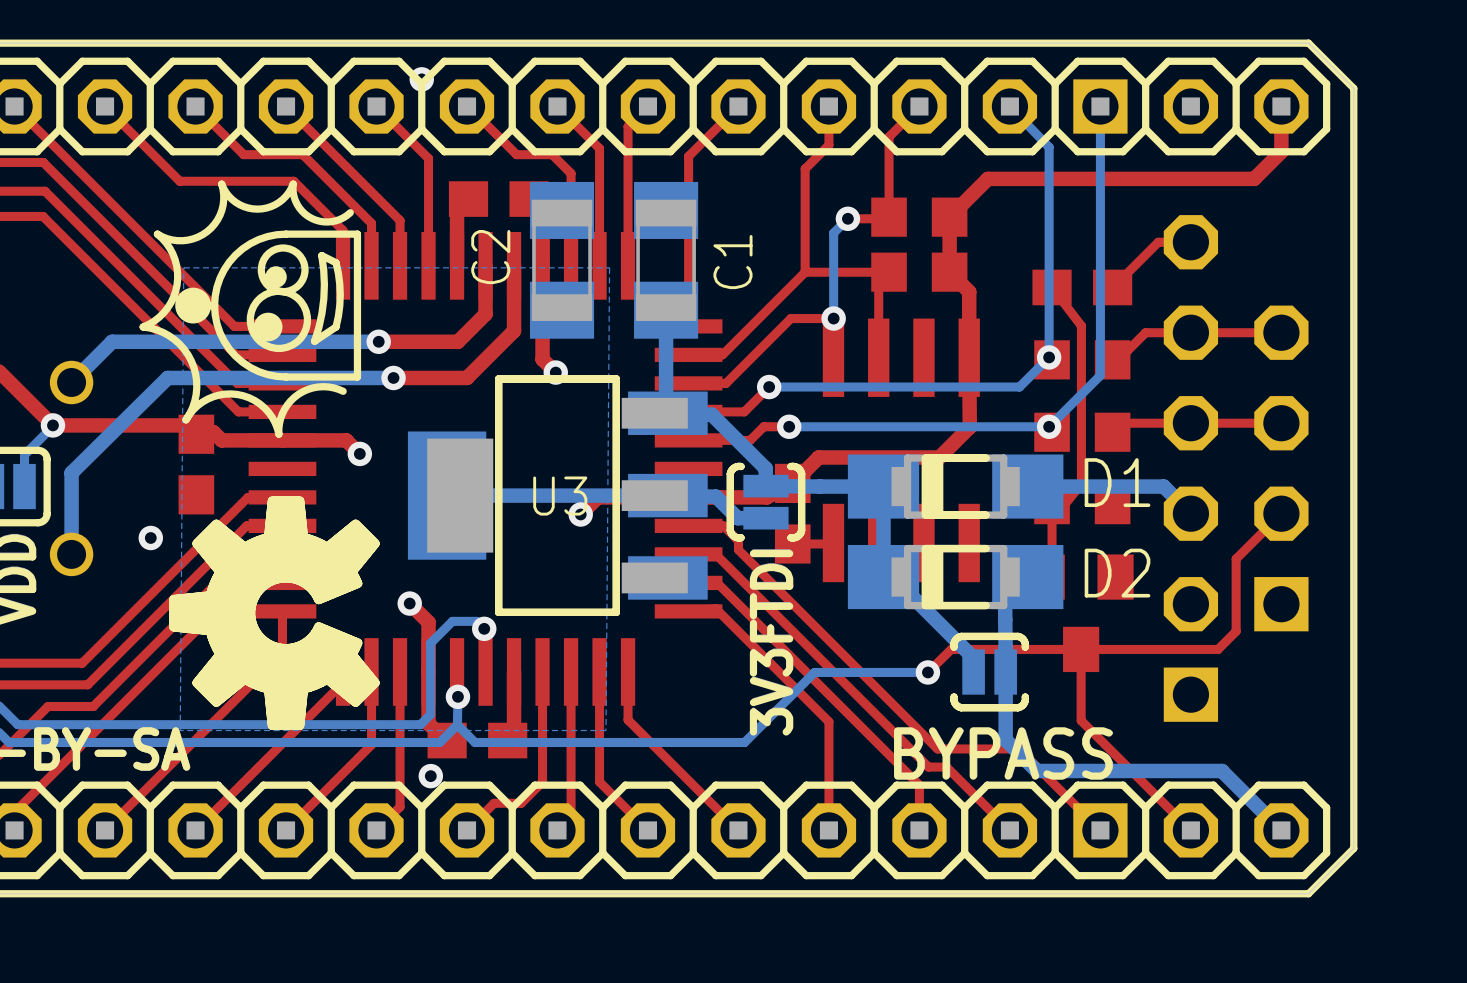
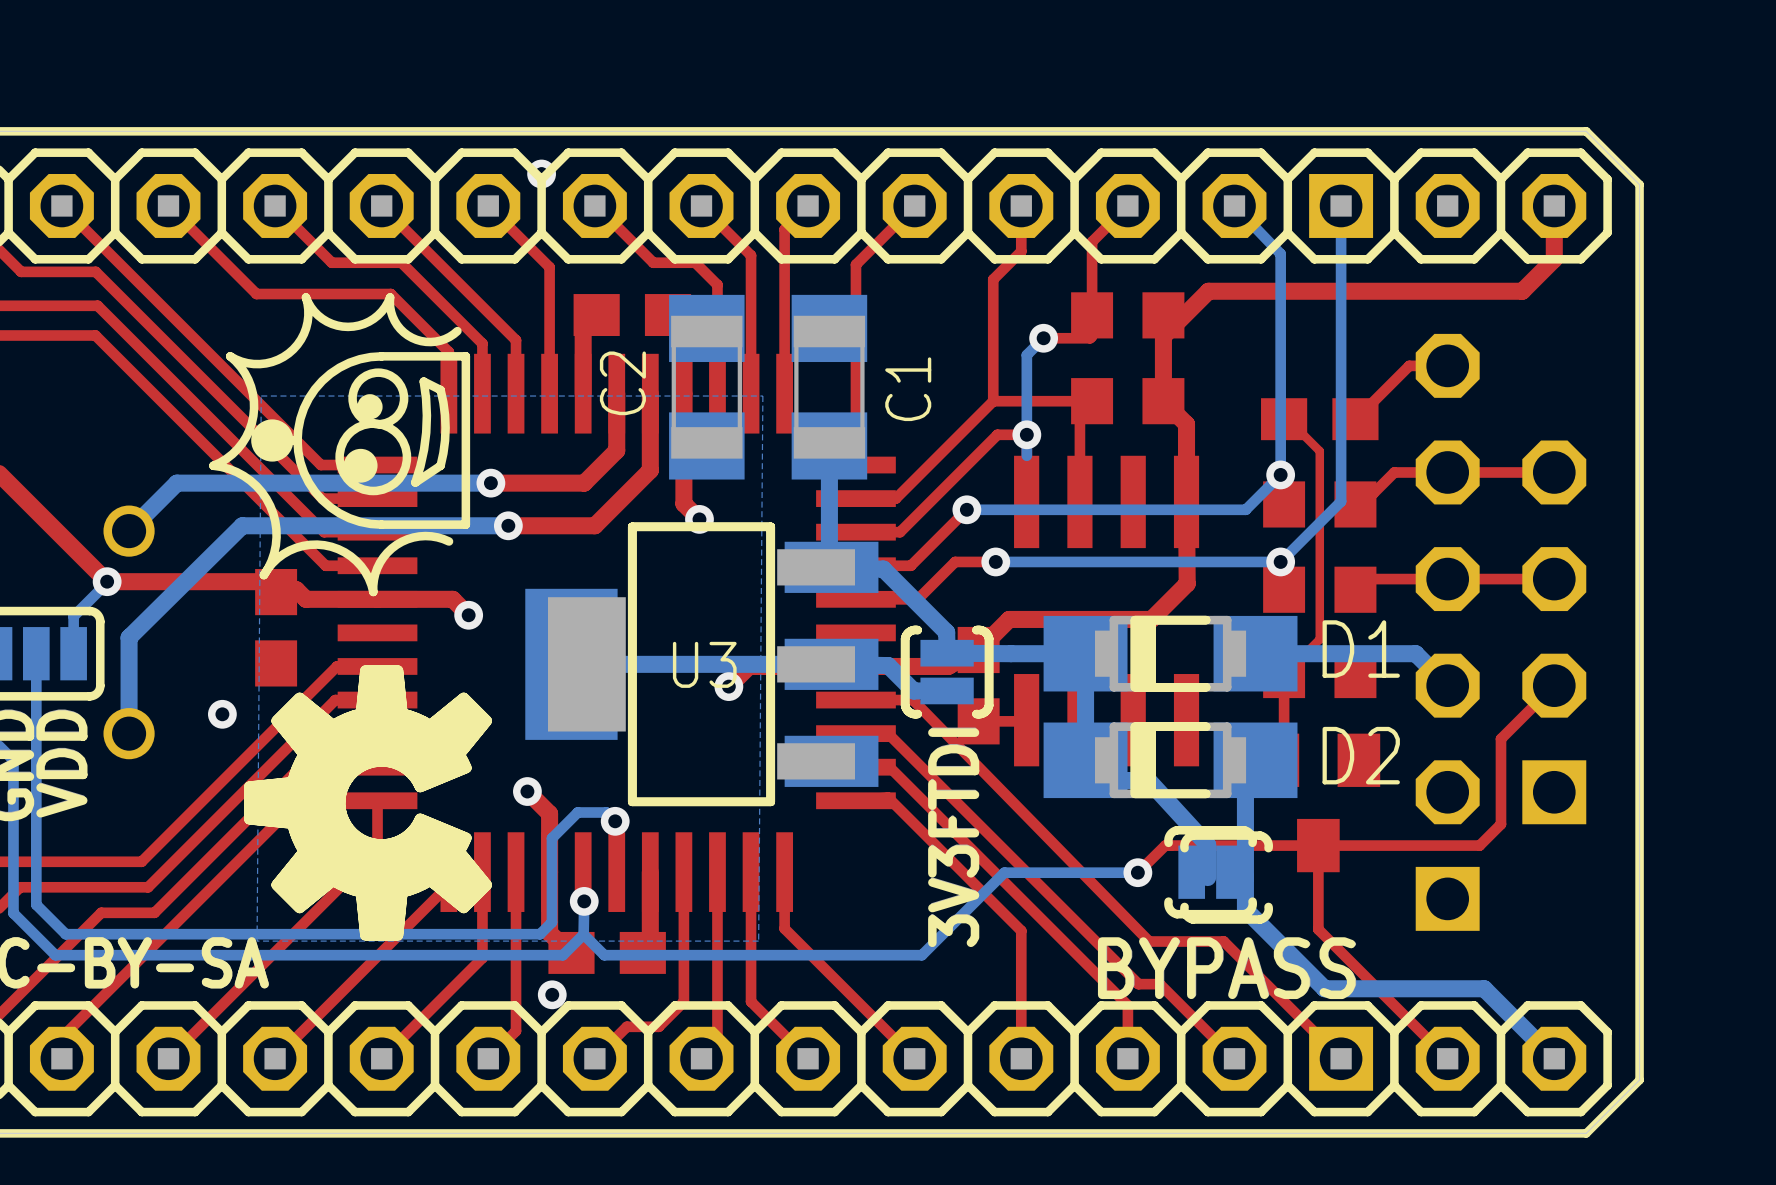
part position: (919, 217) -> (1127, 315)
top track: (1052, 287) (1081, 325) (1081, 483) (1052, 520) -> (1284, 419) (1287, 419) (1319, 451) (1319, 639) (1284, 675)
top track: (833, 318) (790, 318) -> (1026, 455) (1026, 434) (997, 434) (976, 455)
via position: (833, 318) -> (1026, 434)
bottom track: (1049, 334) (1049, 357) (1019, 387) (769, 387) -> (1280, 474) (1245, 509) (966, 509)
via position: (1049, 357) -> (1280, 474)
bottom track: (1100, 357) (1100, 375) (1049, 426) (789, 426) -> (1341, 501) (1280, 561) (995, 561)
top track: (769, 387) (744, 411) (735, 411) -> (966, 509) (910, 565)
via position: (769, 387) -> (966, 509)
top track: (789, 426) (763, 426) (750, 440) (741, 440) -> (995, 561) (955, 561) (917, 599)
via position: (789, 426) -> (995, 561)
via position: (1049, 426) -> (1280, 561)
top track: (723, 525) (738, 540) (738, 549) (937, 748) (1018, 748) -> (897, 700) (913, 700) (1149, 941) (1223, 941) (1245, 962)
bottom track: (1027, 577) (1005, 577) (1005, 739) (1036, 770) (1086, 770) -> (1255, 760) (1245, 770) (1245, 909) (1324, 988)
bottom track: (909, 594) (973, 657) (973, 672) -> (1116, 780) (1148, 780) (1207, 844) (1207, 877)
line: (1025, 647) (1023, 640) (1018, 636) (961, 636) (955, 640) (954, 647) -> (1268, 848) (1266, 840) (1260, 835) (1192, 835) (1186, 840) (1184, 848)
line: (1025, 696) (1023, 703) (1018, 707) (961, 707) (955, 703) (954, 696) -> (1268, 906) (1266, 914) (1260, 919) (1192, 919) (1186, 914) (1184, 906)

